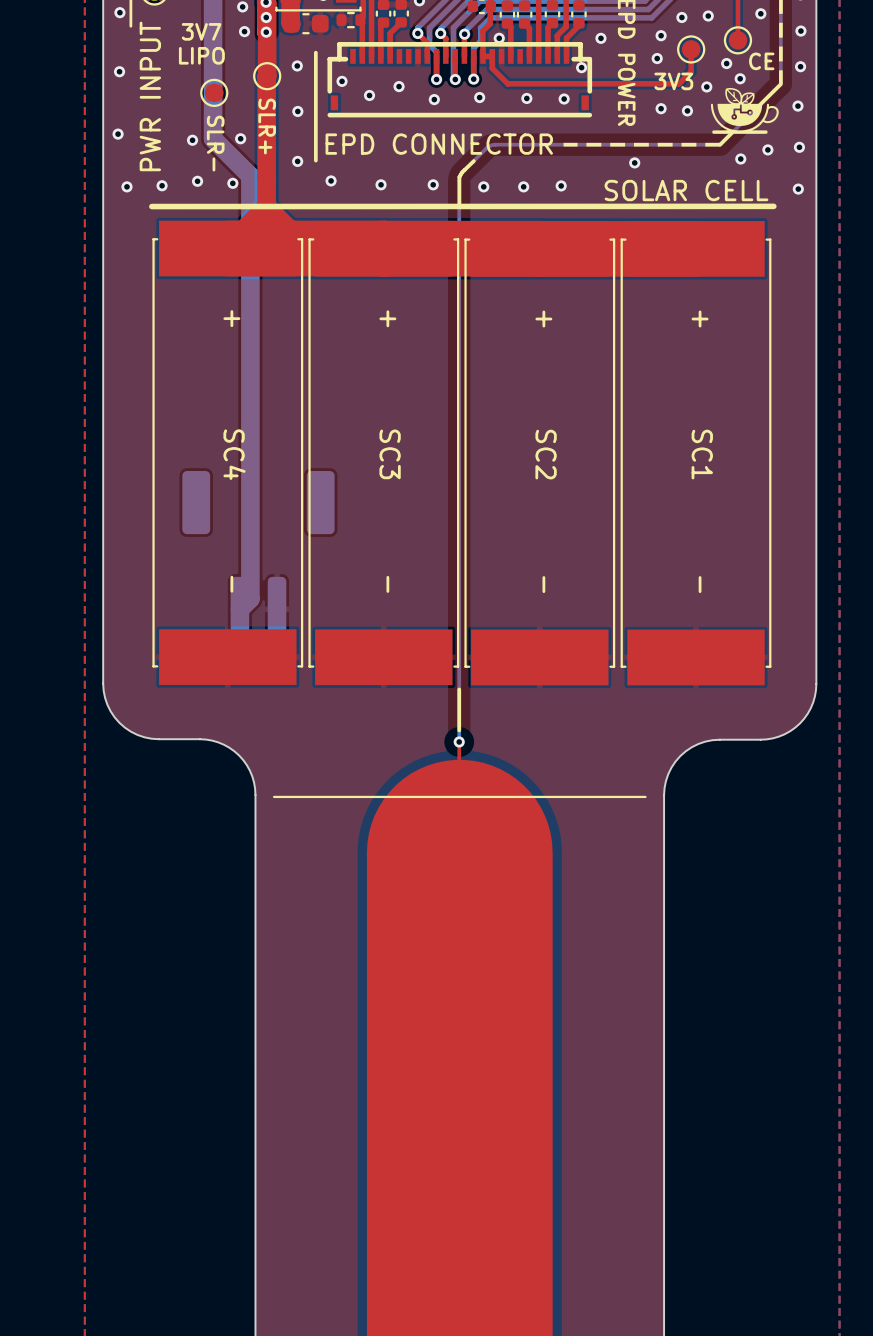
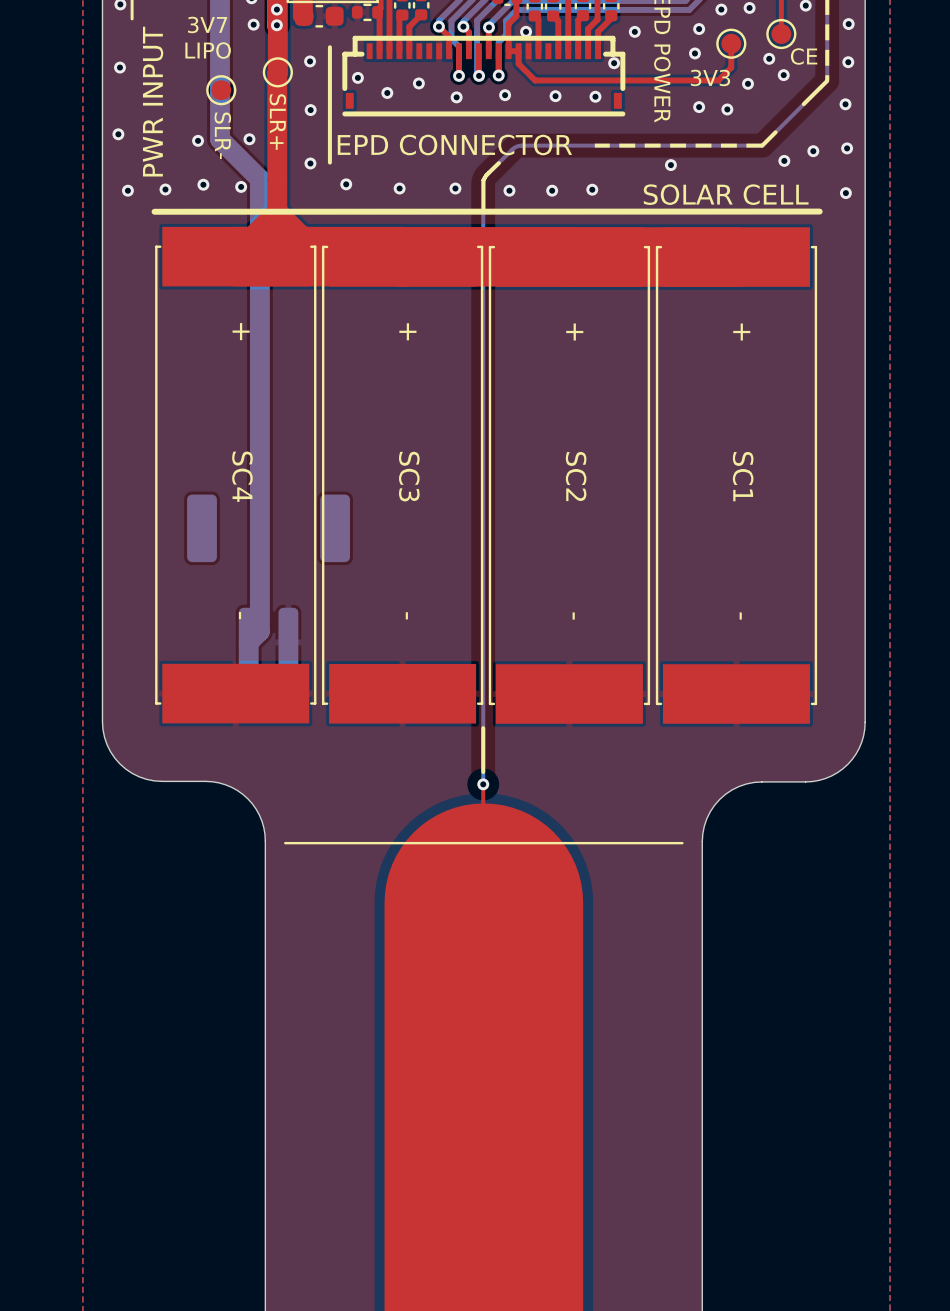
drawing: [710, 87, 779, 134] -> none

